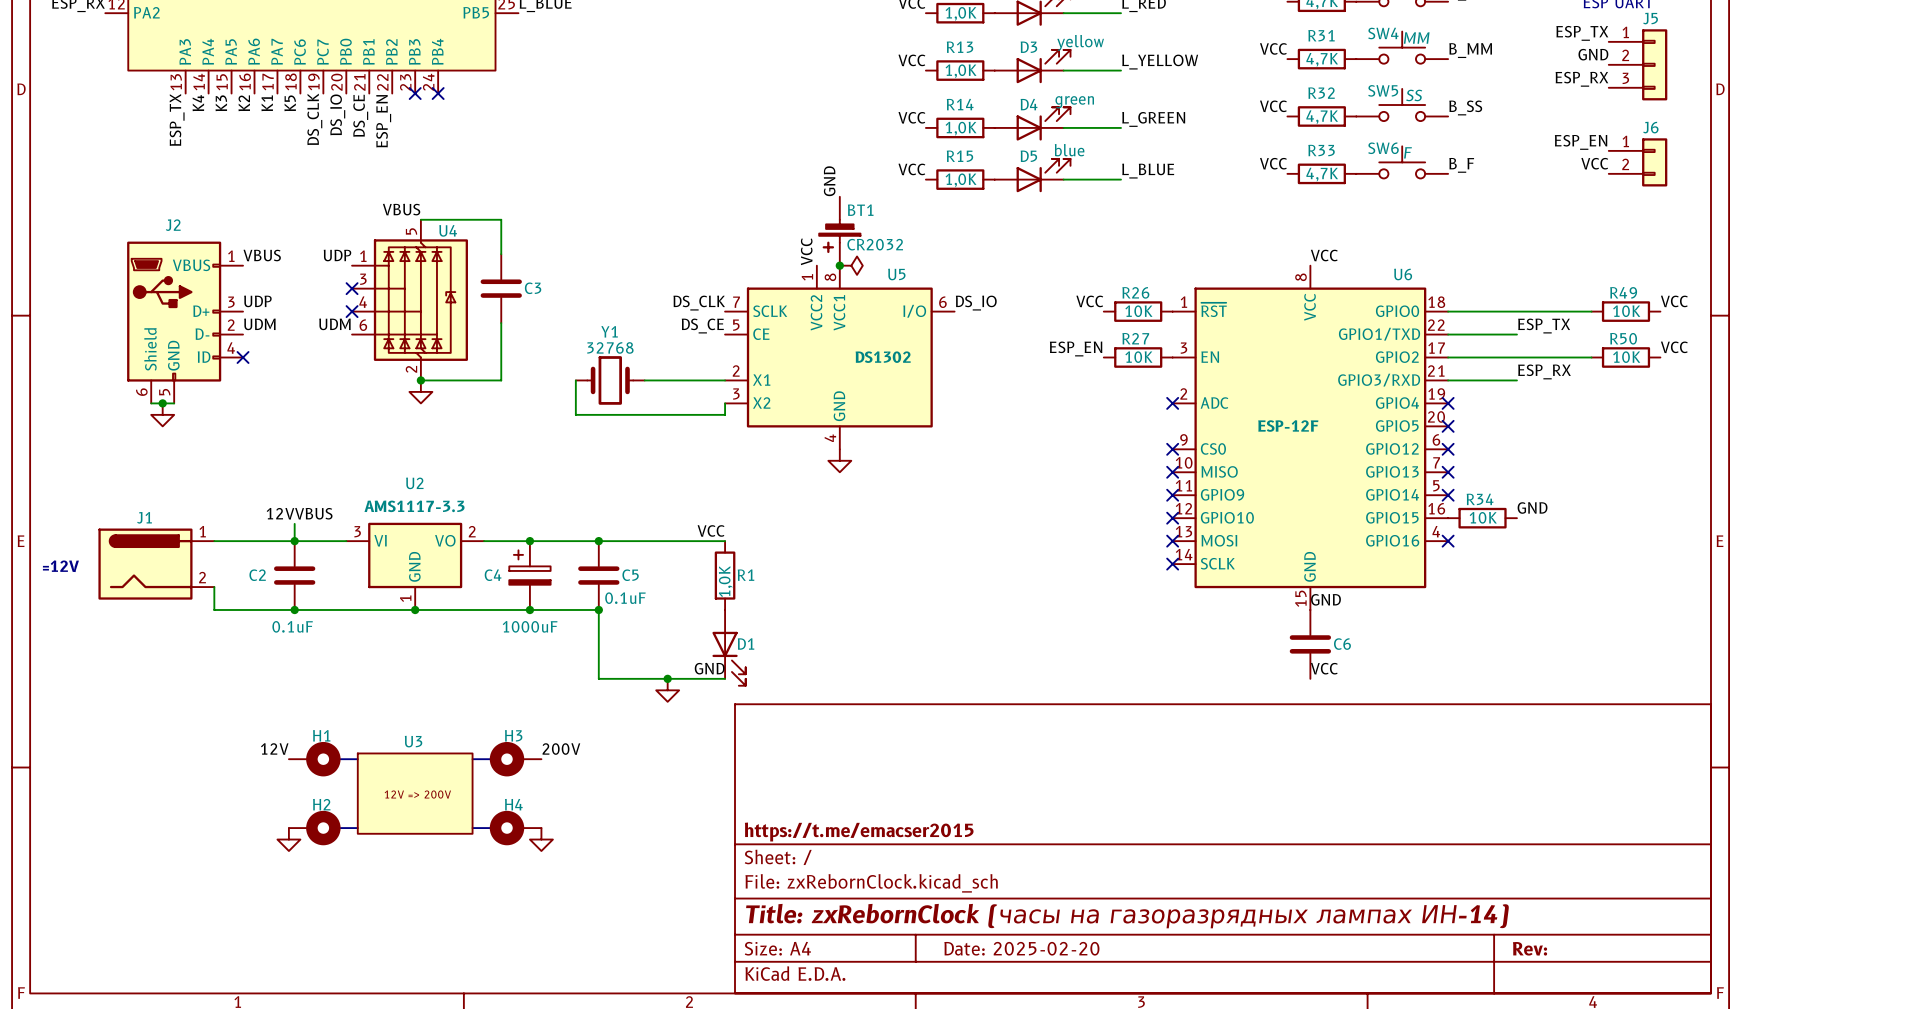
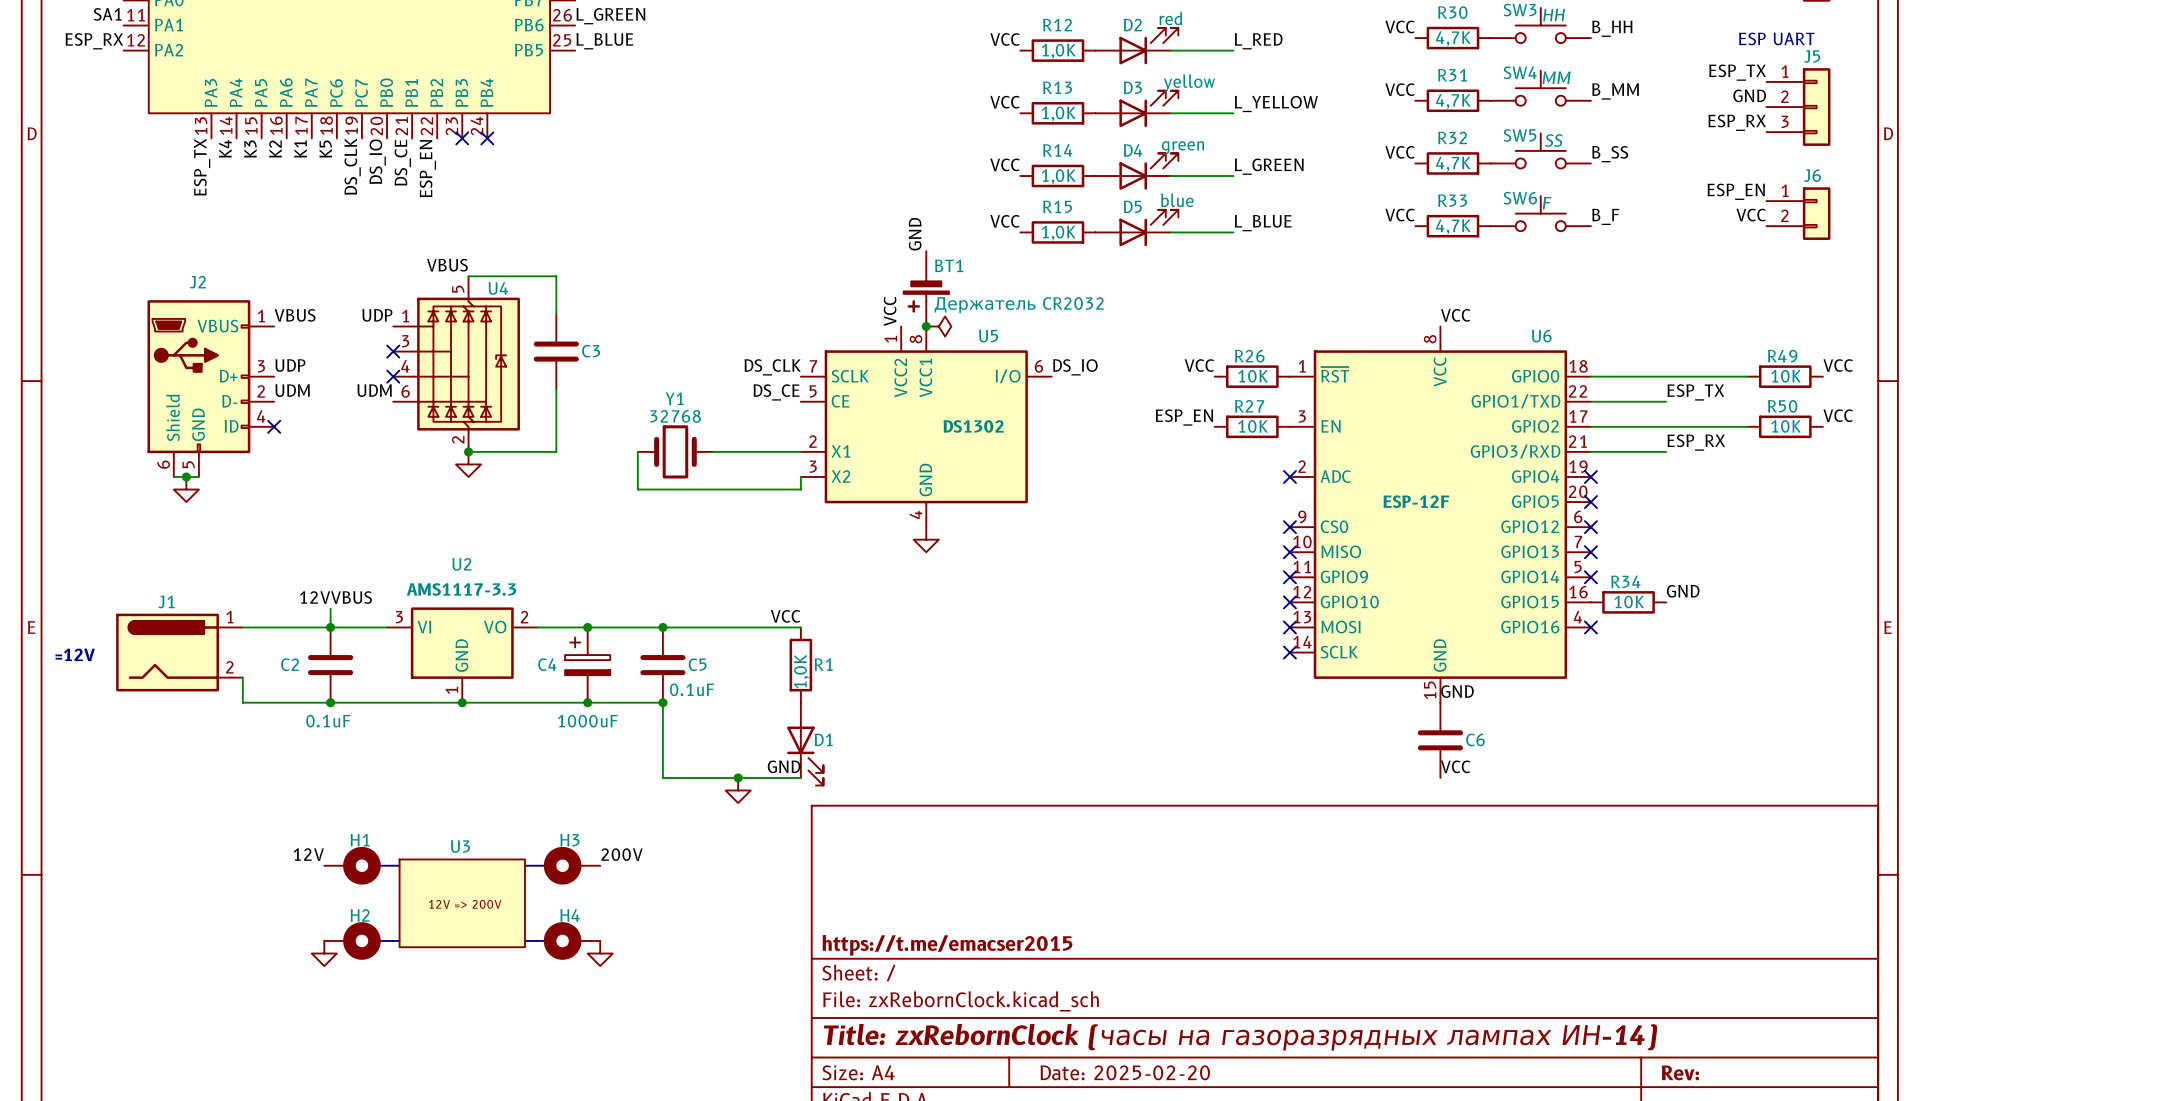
BT1 value: CR2032 (875, 244) -> Держатель CR2032 (1019, 305)

